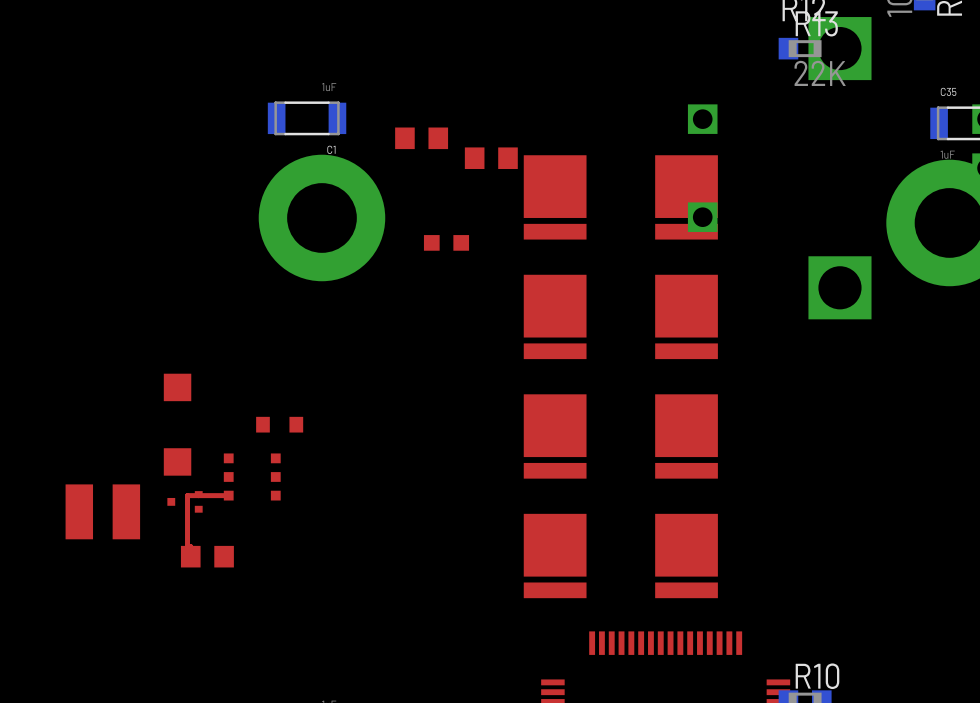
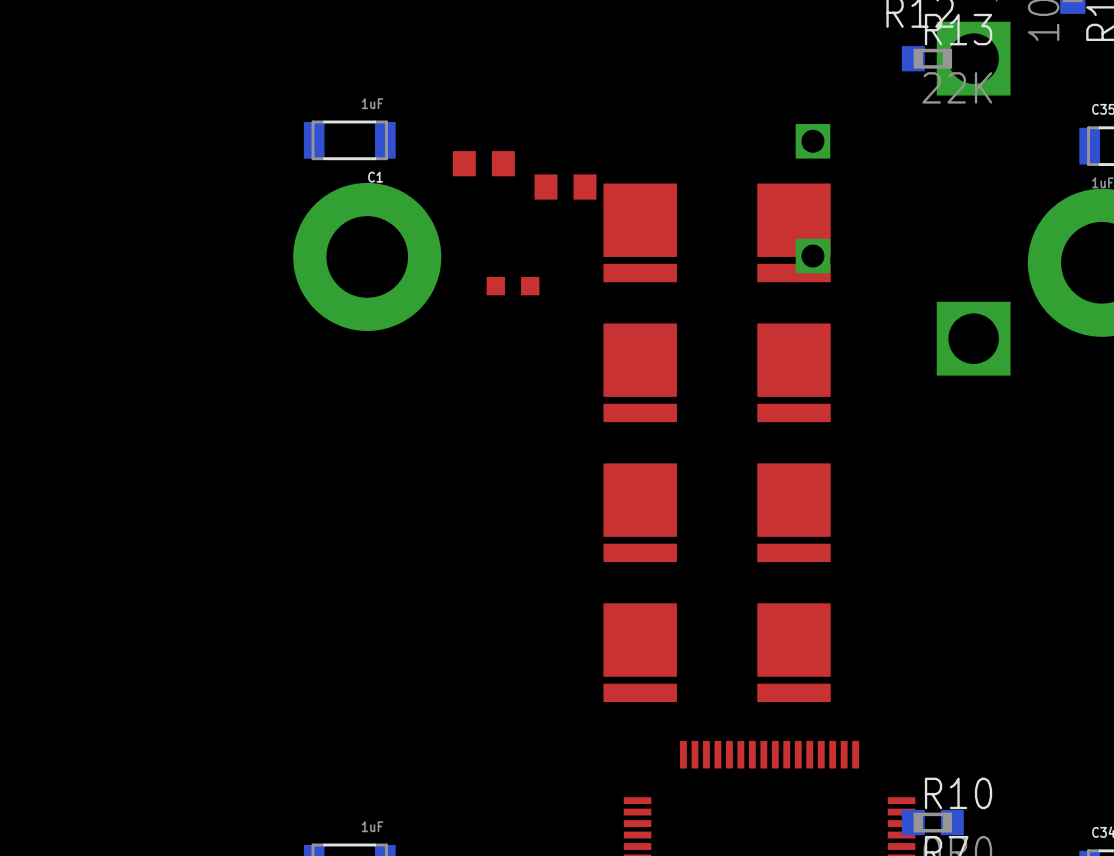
part: (177, 424) -> none
part: (279, 424) -> none
part: (252, 476) -> none
top track: (228, 495) (187, 495) (187, 546) (190, 546) (190, 556) -> none
part: (185, 501) -> none
part: (102, 511) -> none
part: (207, 556) -> none

